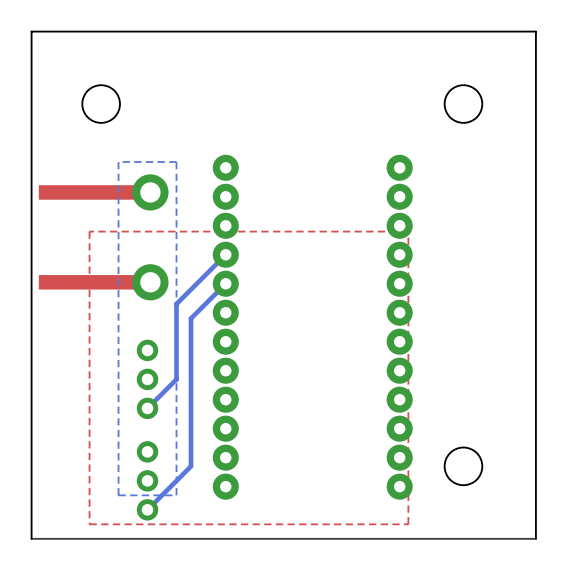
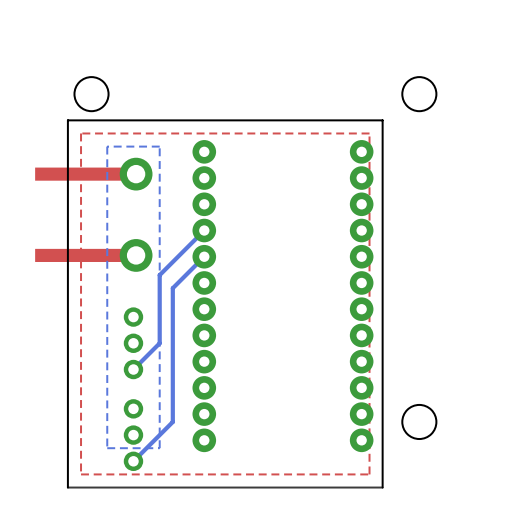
top zone outline: (408, 231) (89, 231) -> (369, 209) (369, 133) (81, 133) (81, 209)
line: (75, 538) (31, 538) -> none
board edge: none -> (382, 487) (382, 120) (67, 120) (67, 487)
line: (535, 538) (422, 538) -> none
board edge: (535, 538) (535, 31) (31, 31) (31, 538) -> none

